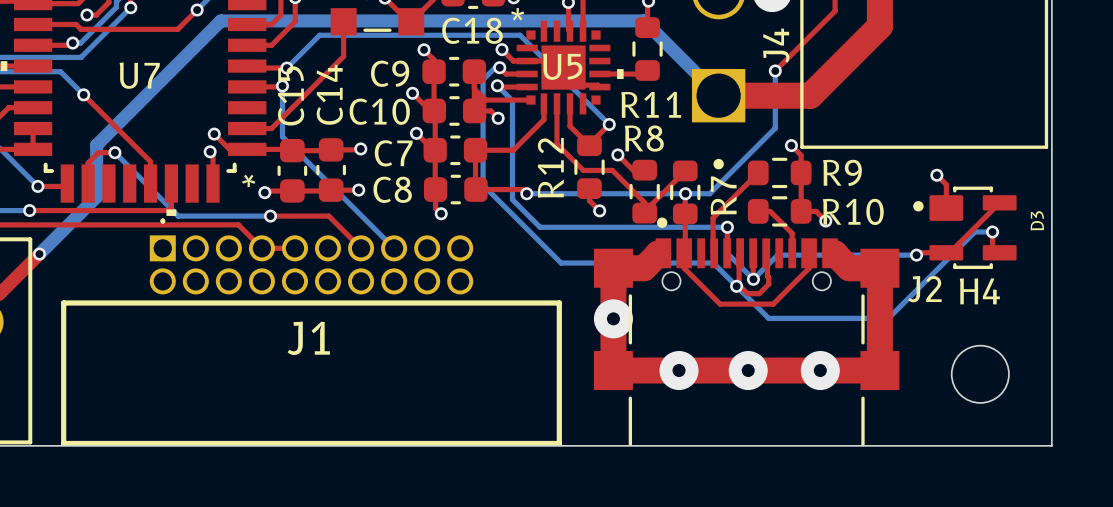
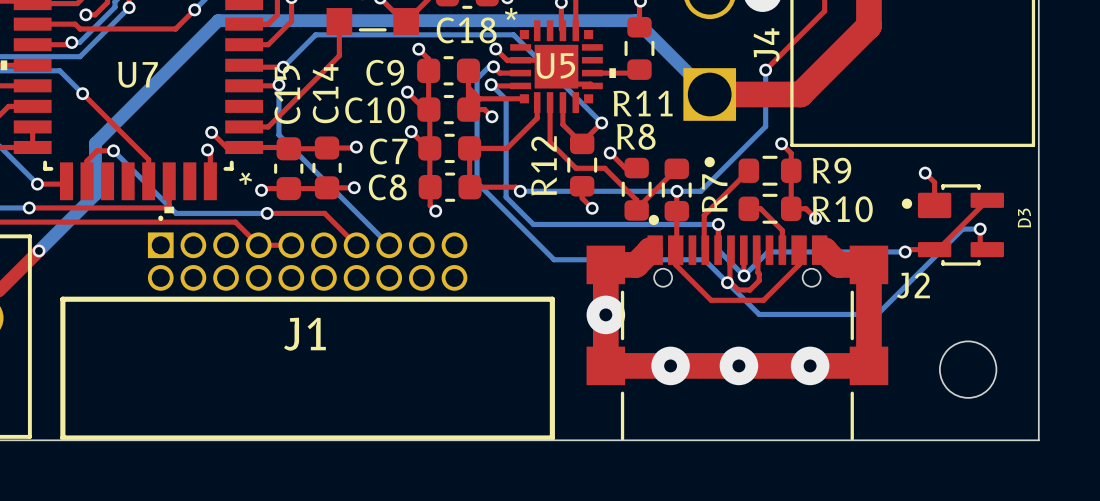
H4 name: H4 (979, 291) -> none

